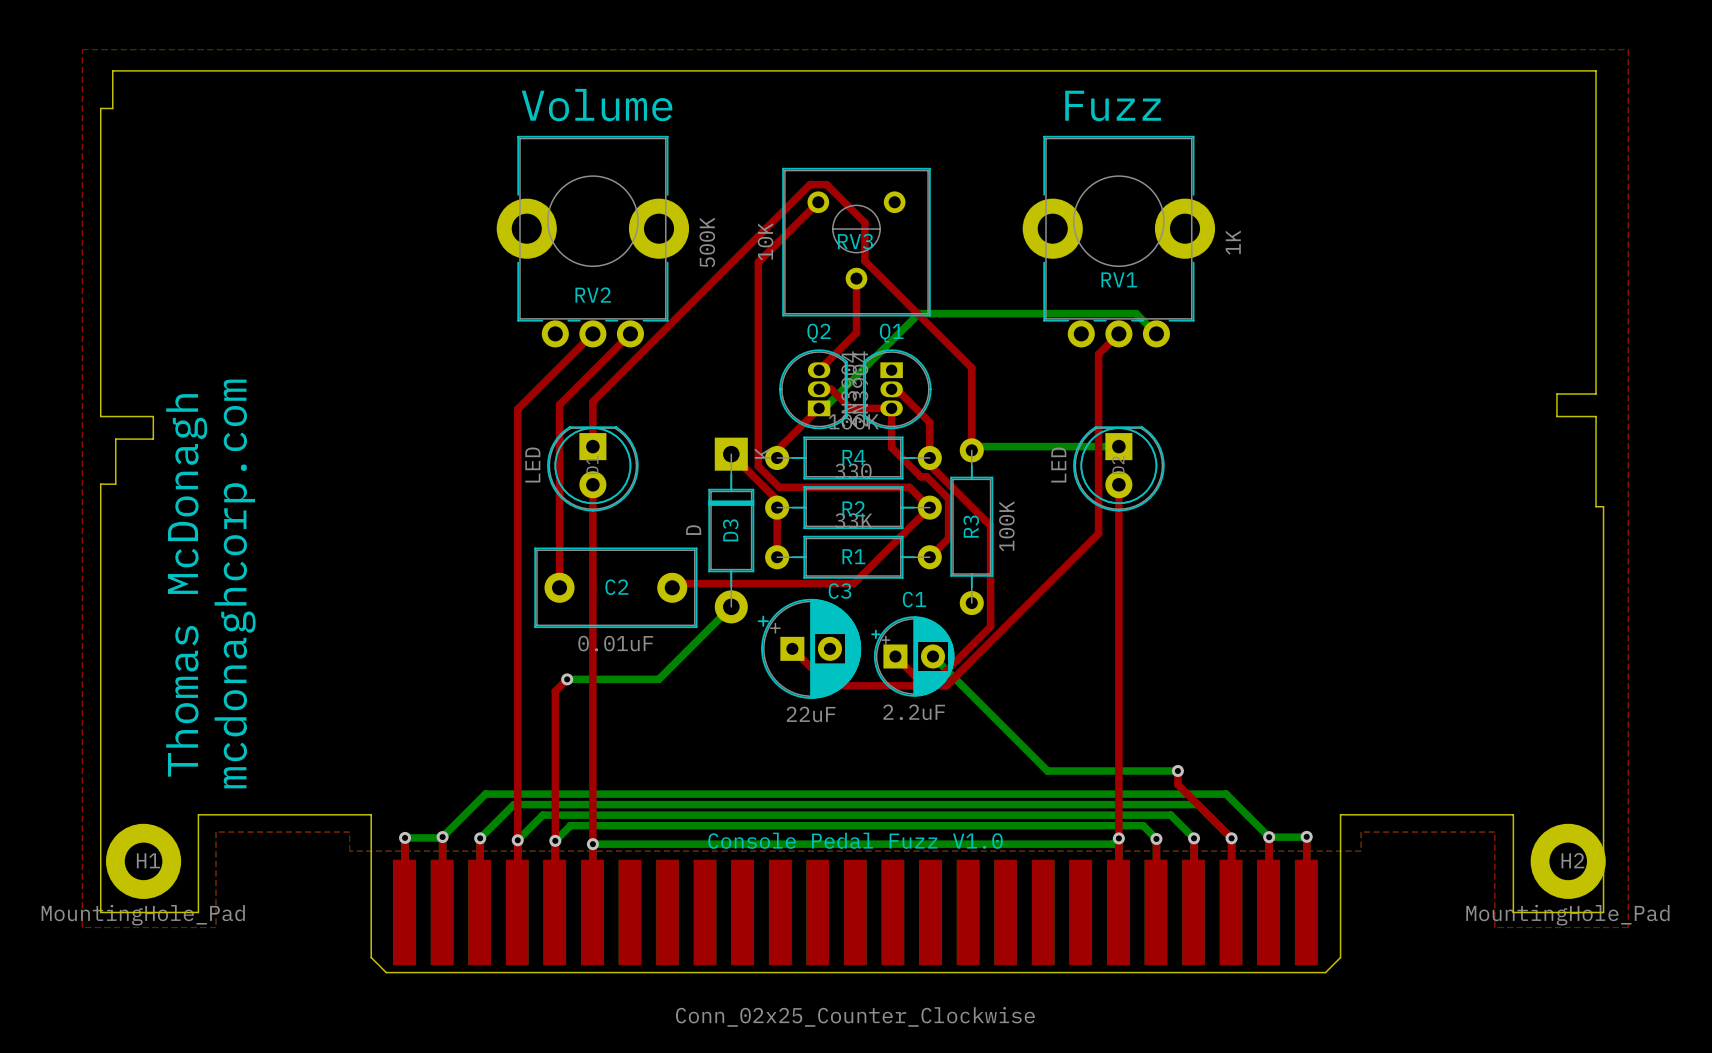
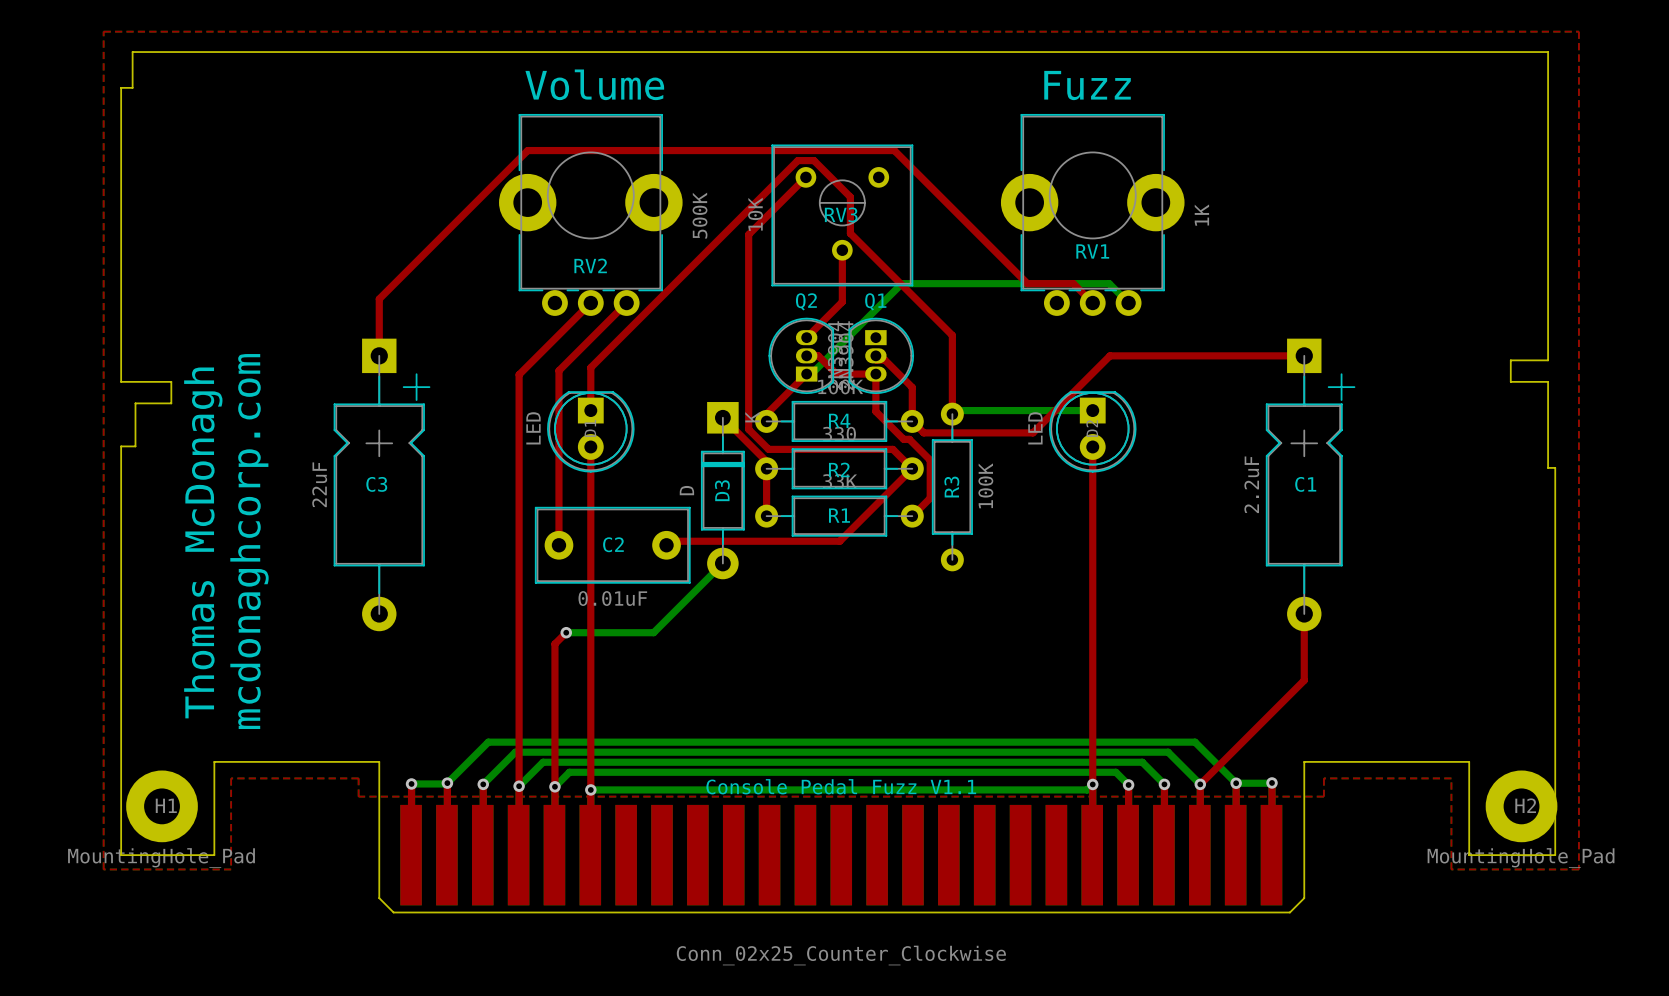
top track: (1118, 333) (1098, 354) (1098, 533) (946, 685) (829, 685) (792, 648) -> (1092, 303) (1073, 283) (1027, 283) (894, 150) (527, 150) (379, 299) (379, 355)
top track: (929, 457) (929, 464) (990, 525) (990, 626) (942, 675) (914, 675) (895, 656) -> (912, 421) (923, 432) (1032, 432) (1110, 355) (1304, 355)
C3 name position: C3 (839, 591) -> C3 (376, 484)
C3 footprint: [757, 598, 862, 699] -> [333, 338, 431, 632]
C1 name position: C1 (914, 599) -> C1 (1305, 484)
C1 footprint: [871, 616, 955, 697] -> [1265, 338, 1356, 632]
bottom track: (933, 656) (1047, 771) (1177, 771) -> none
C1 value position: 2.2uF (914, 712) -> 2.2uF (1251, 484)
C3 value position: 22uF (811, 714) -> 22uF (319, 484)
top track: (1177, 771) (1177, 784) (1231, 838) -> (1304, 614) (1304, 680) (1200, 784)
via: (1177, 771) -> none
text: Console Pedal Fuzz V1.0 (855, 840) -> Console Pedal Fuzz V1.1 (841, 786)

